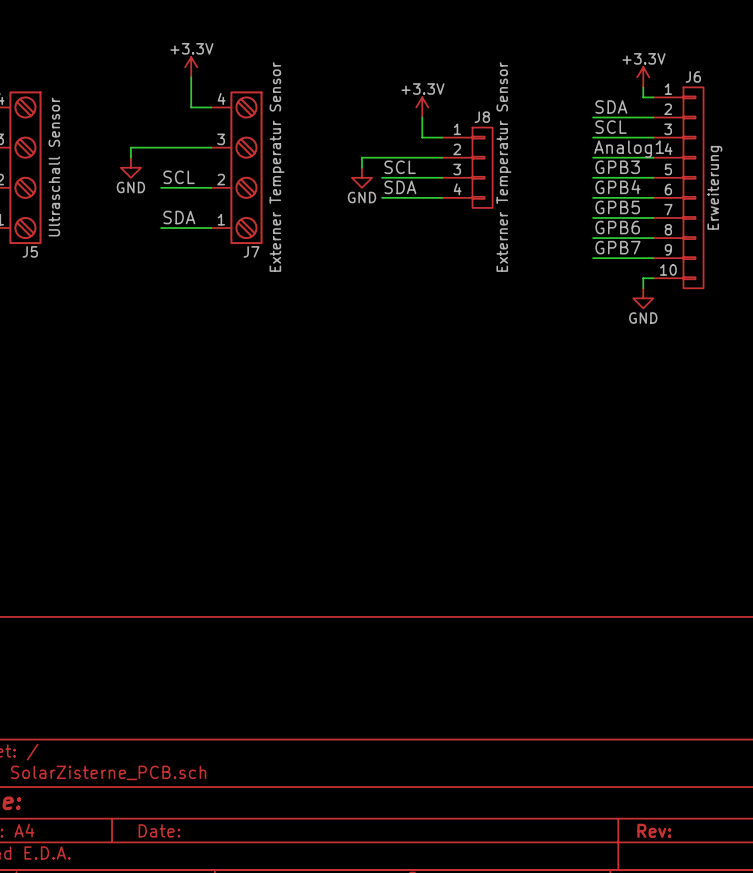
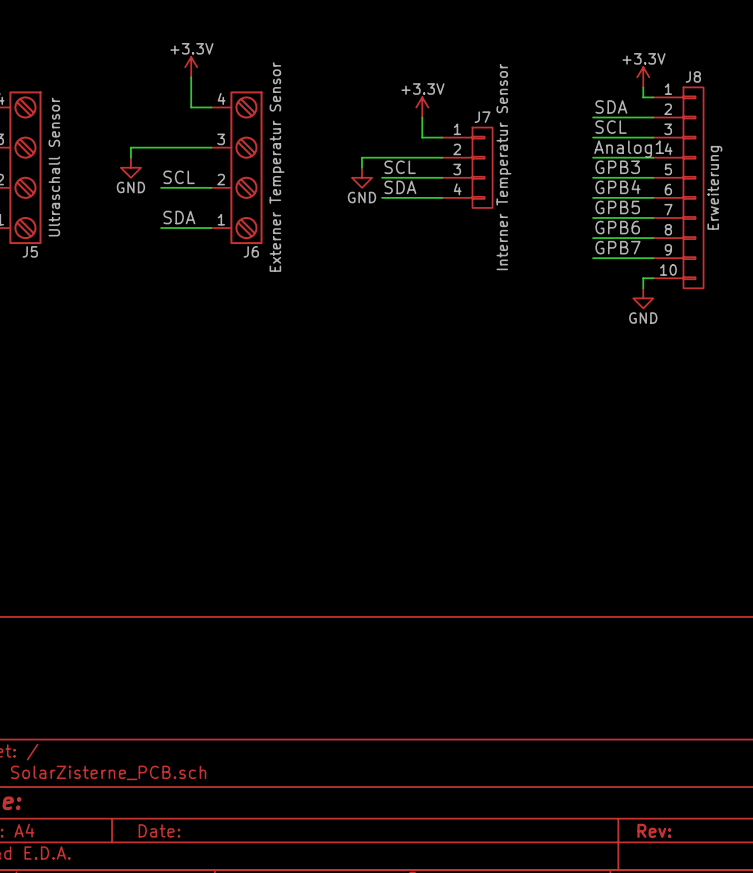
J6 name: J6 (693, 76) -> J8 (693, 76)
J8 name: J8 (482, 117) -> J7 (482, 117)
J8 value: Externer Temperatur Sensor (503, 167) -> Interner Temperatur Sensor (503, 167)
J7 name: J7 (251, 251) -> J6 (251, 251)

